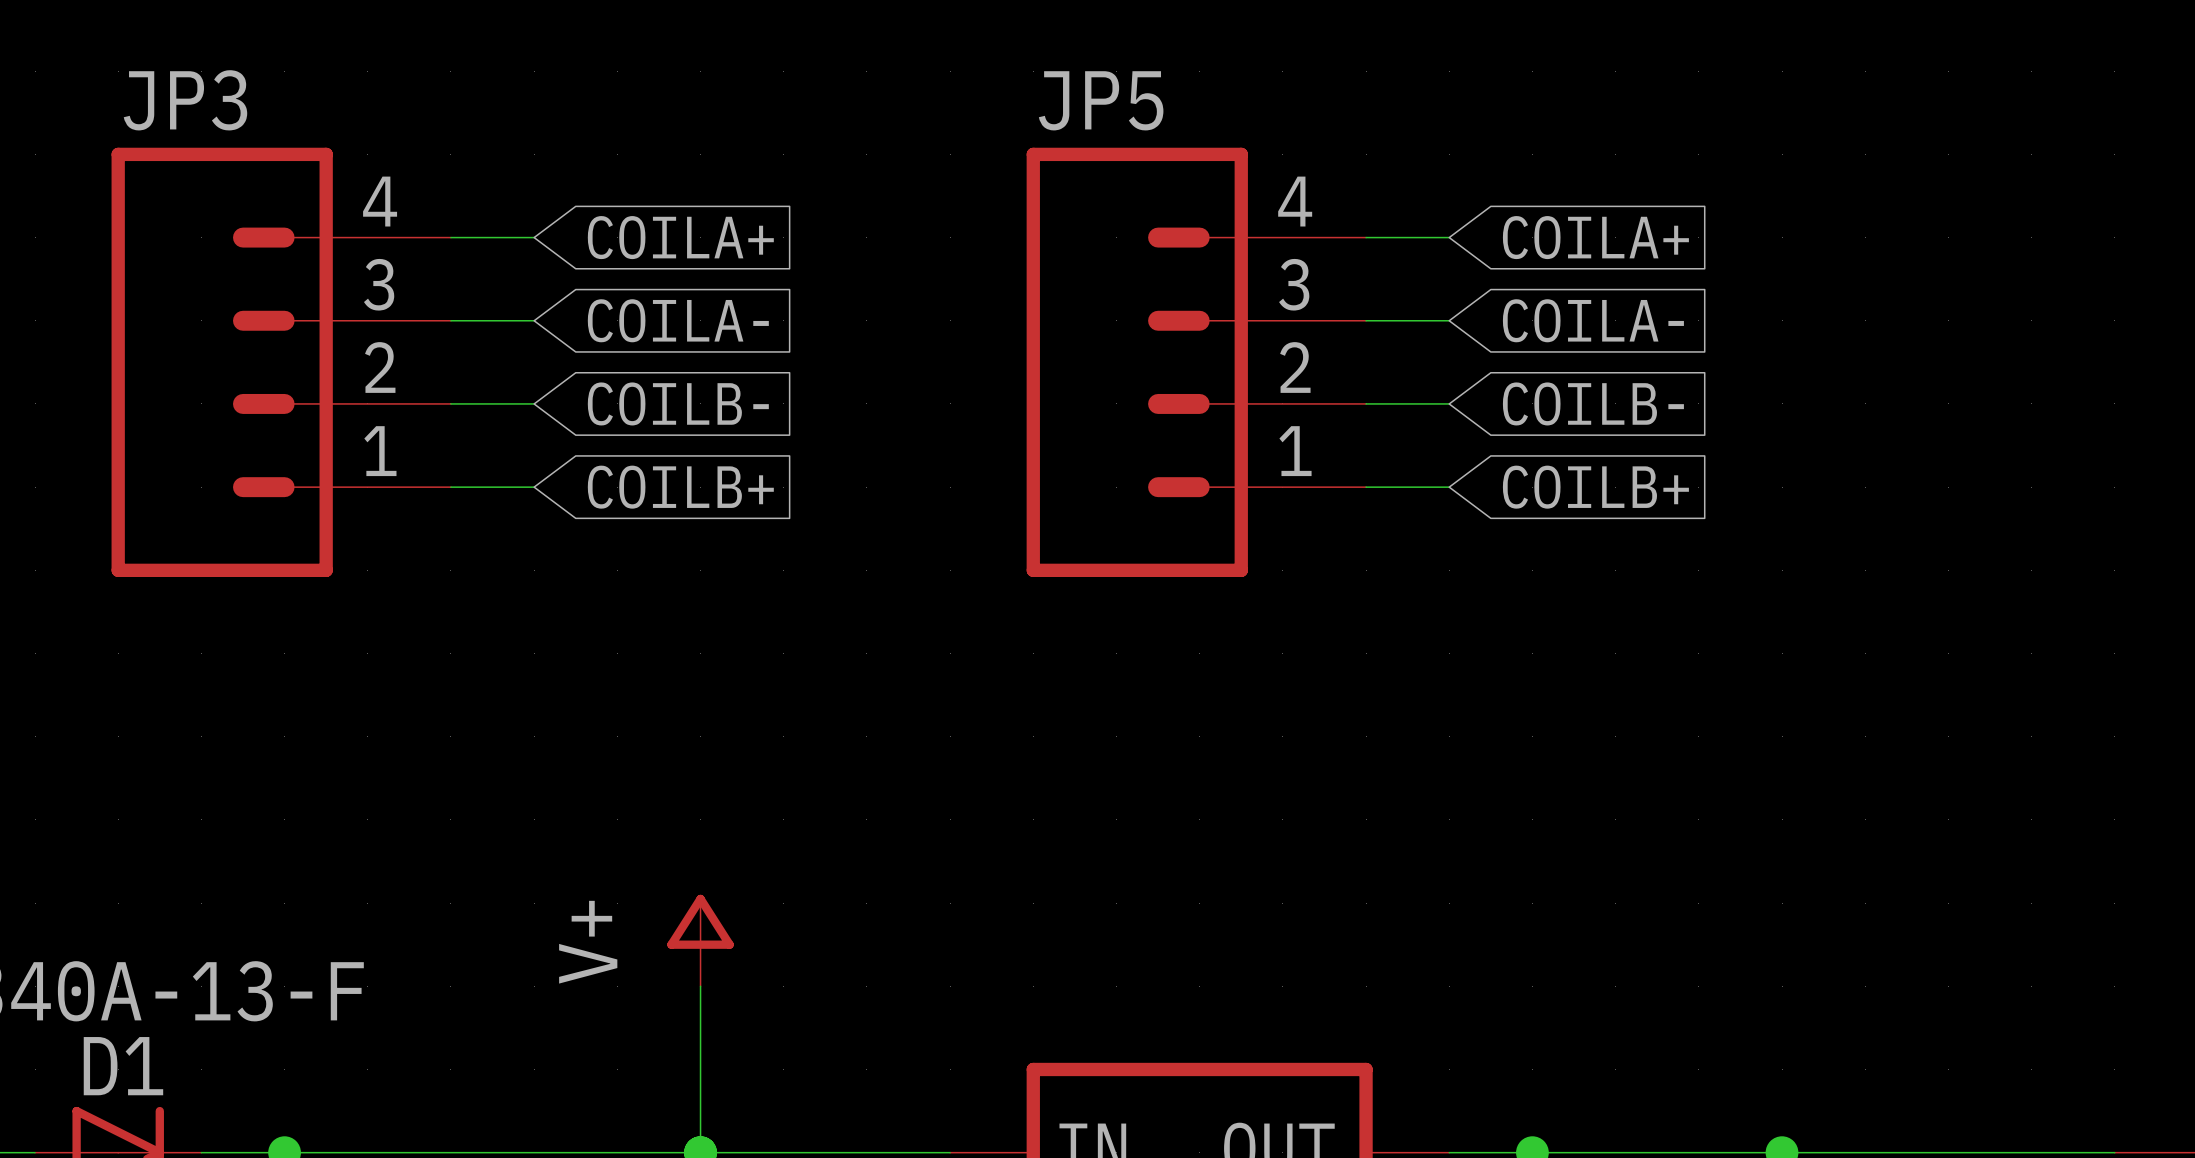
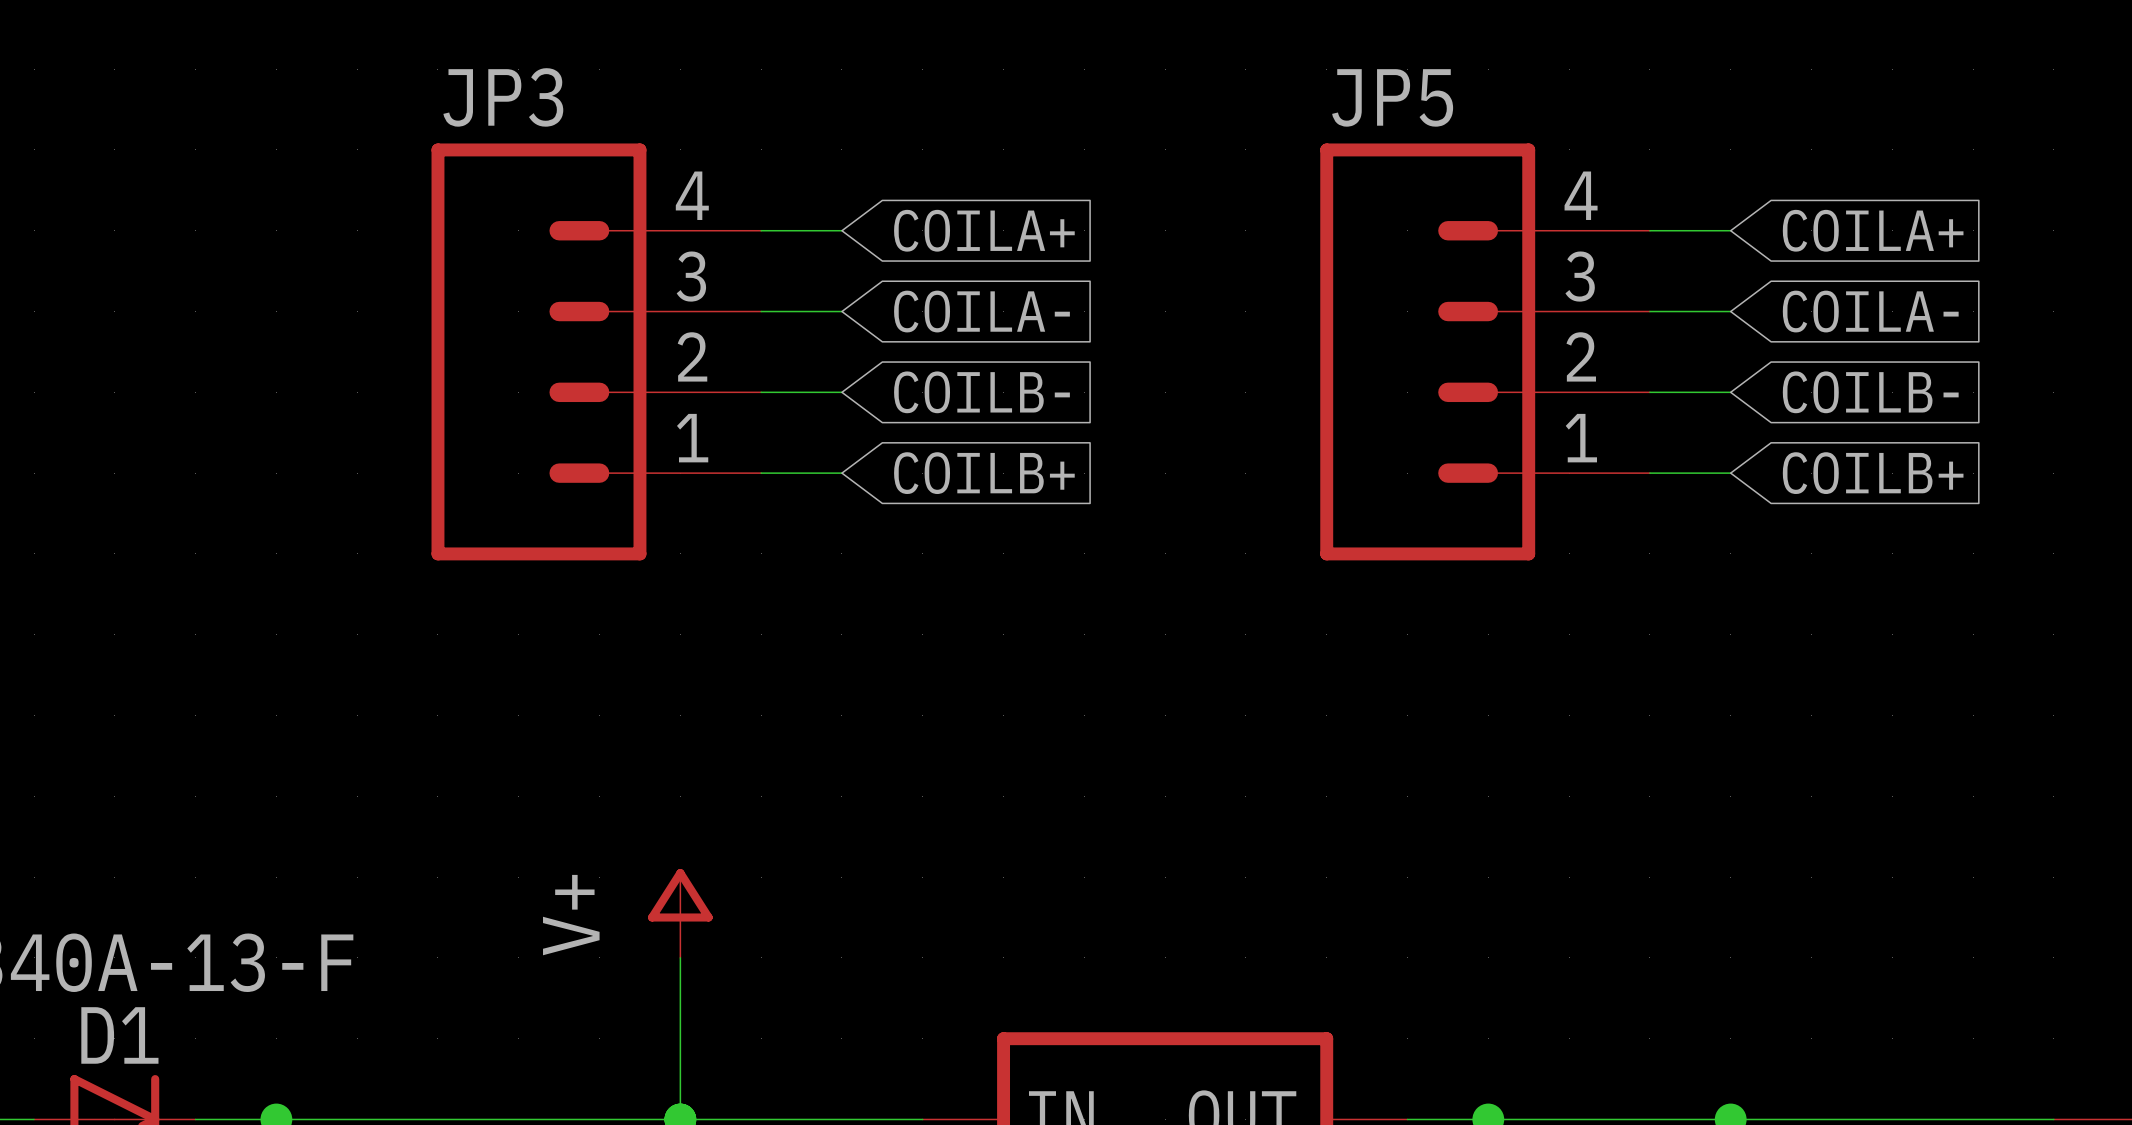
wire: (450, 237) (534, 237) -> (761, 230) (841, 230)
global label: COILA+ (680, 237) -> none
global label: none -> COILA+ (984, 230)
wire: (1366, 237) (1449, 237) -> (1649, 230) (1730, 230)
global label: COILA+ (1595, 237) -> none
global label: none -> COILA+ (1873, 230)
wire: (450, 320) (534, 320) -> (761, 311) (841, 311)
global label: COILA- (678, 320) -> none
global label: none -> COILA- (981, 311)
wire: (1366, 320) (1449, 320) -> (1649, 311) (1730, 311)
global label: COILA- (1593, 320) -> none
global label: none -> COILA- (1870, 311)
JP3 position: (281, 362) -> (596, 351)
JP5 position: (1196, 362) -> (1485, 351)
wire: (450, 403) (534, 403) -> (761, 392) (841, 392)
global label: COILB- (678, 403) -> none
global label: none -> COILB- (981, 392)
wire: (1366, 403) (1449, 403) -> (1649, 392) (1730, 392)
global label: COILB- (1593, 403) -> none
global label: none -> COILB- (1870, 392)
wire: (450, 487) (534, 487) -> (761, 473) (841, 473)
global label: COILB+ (680, 487) -> none
global label: none -> COILB+ (984, 473)
wire: (1366, 487) (1449, 487) -> (1649, 473) (1730, 473)
global label: COILB+ (1595, 487) -> none
global label: none -> COILB+ (1873, 473)

